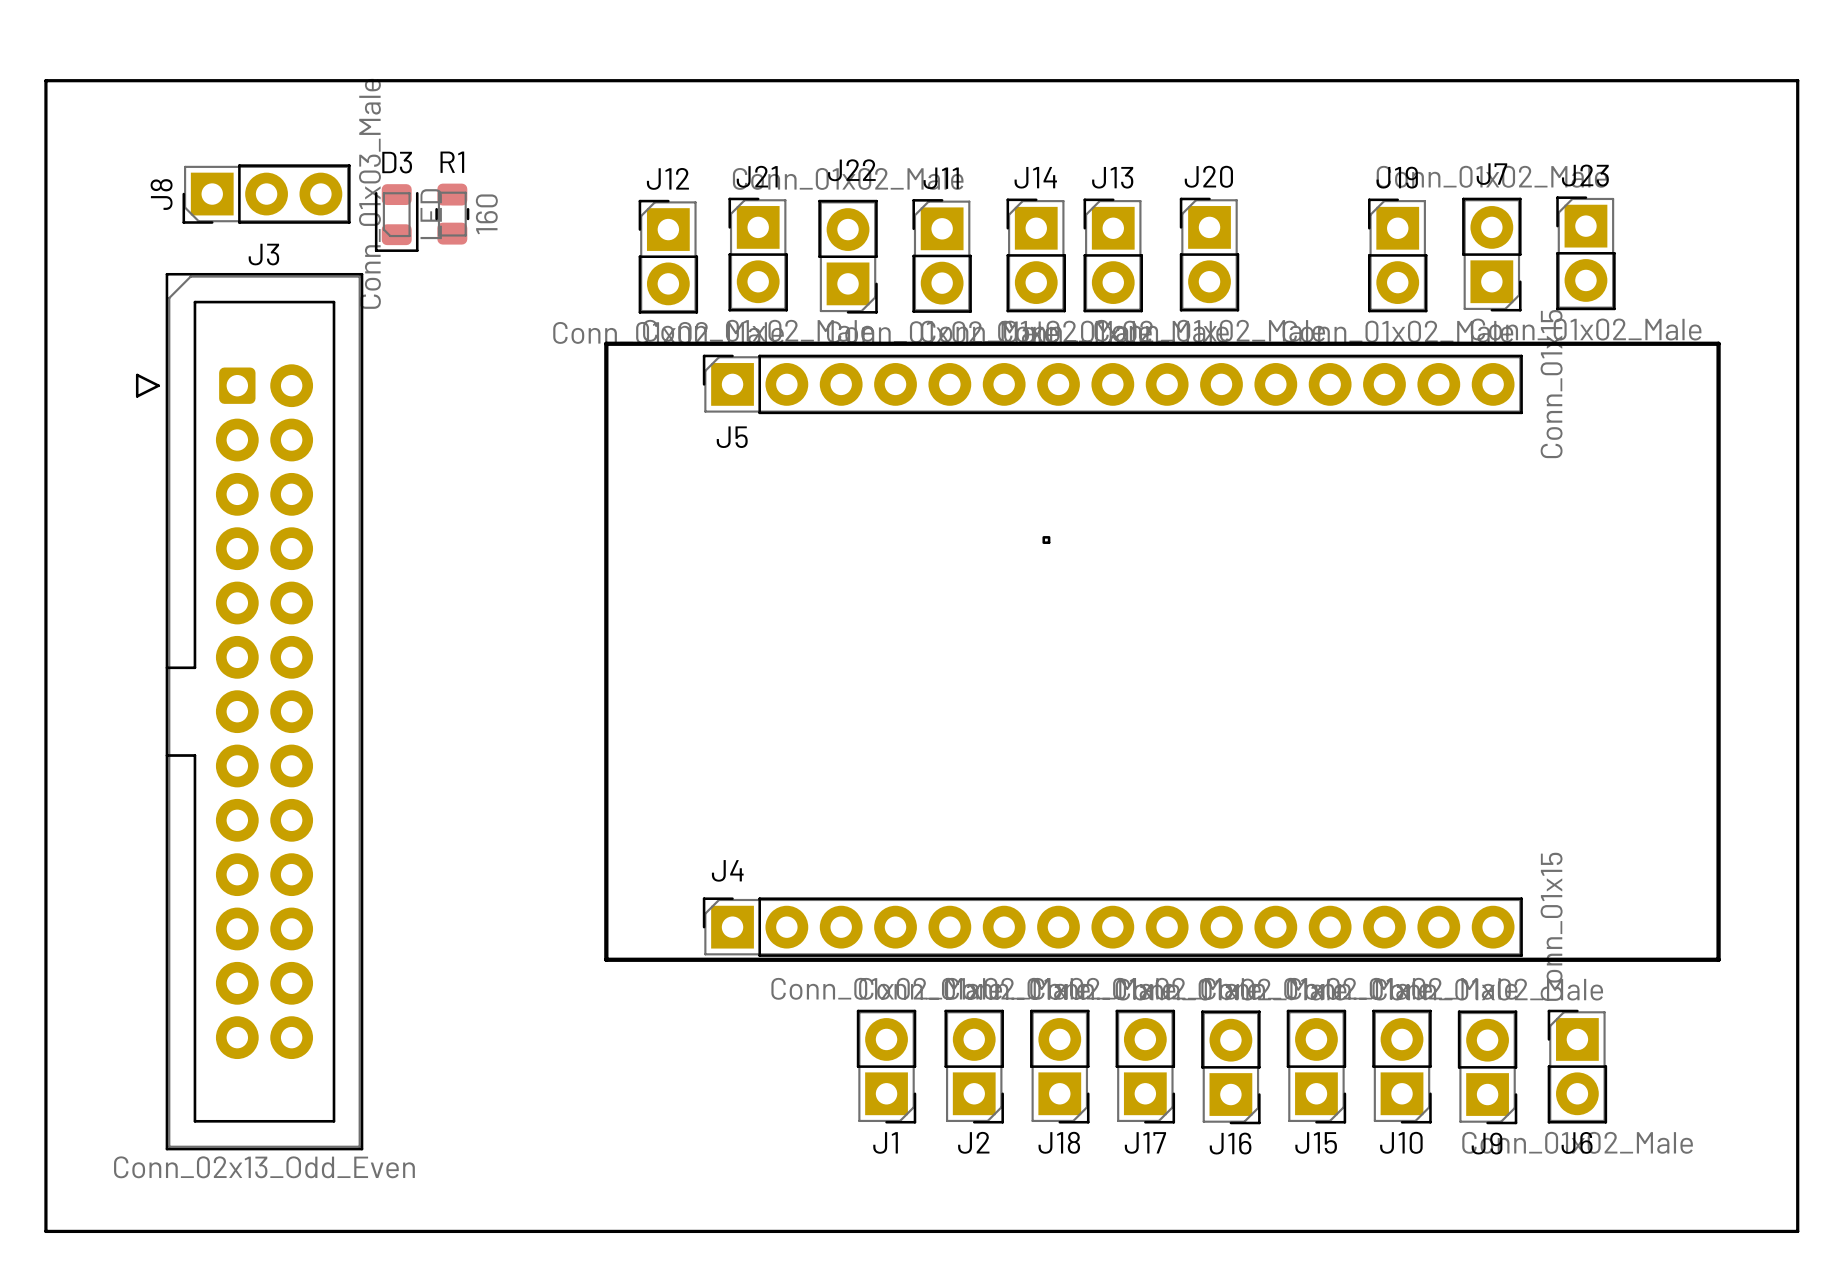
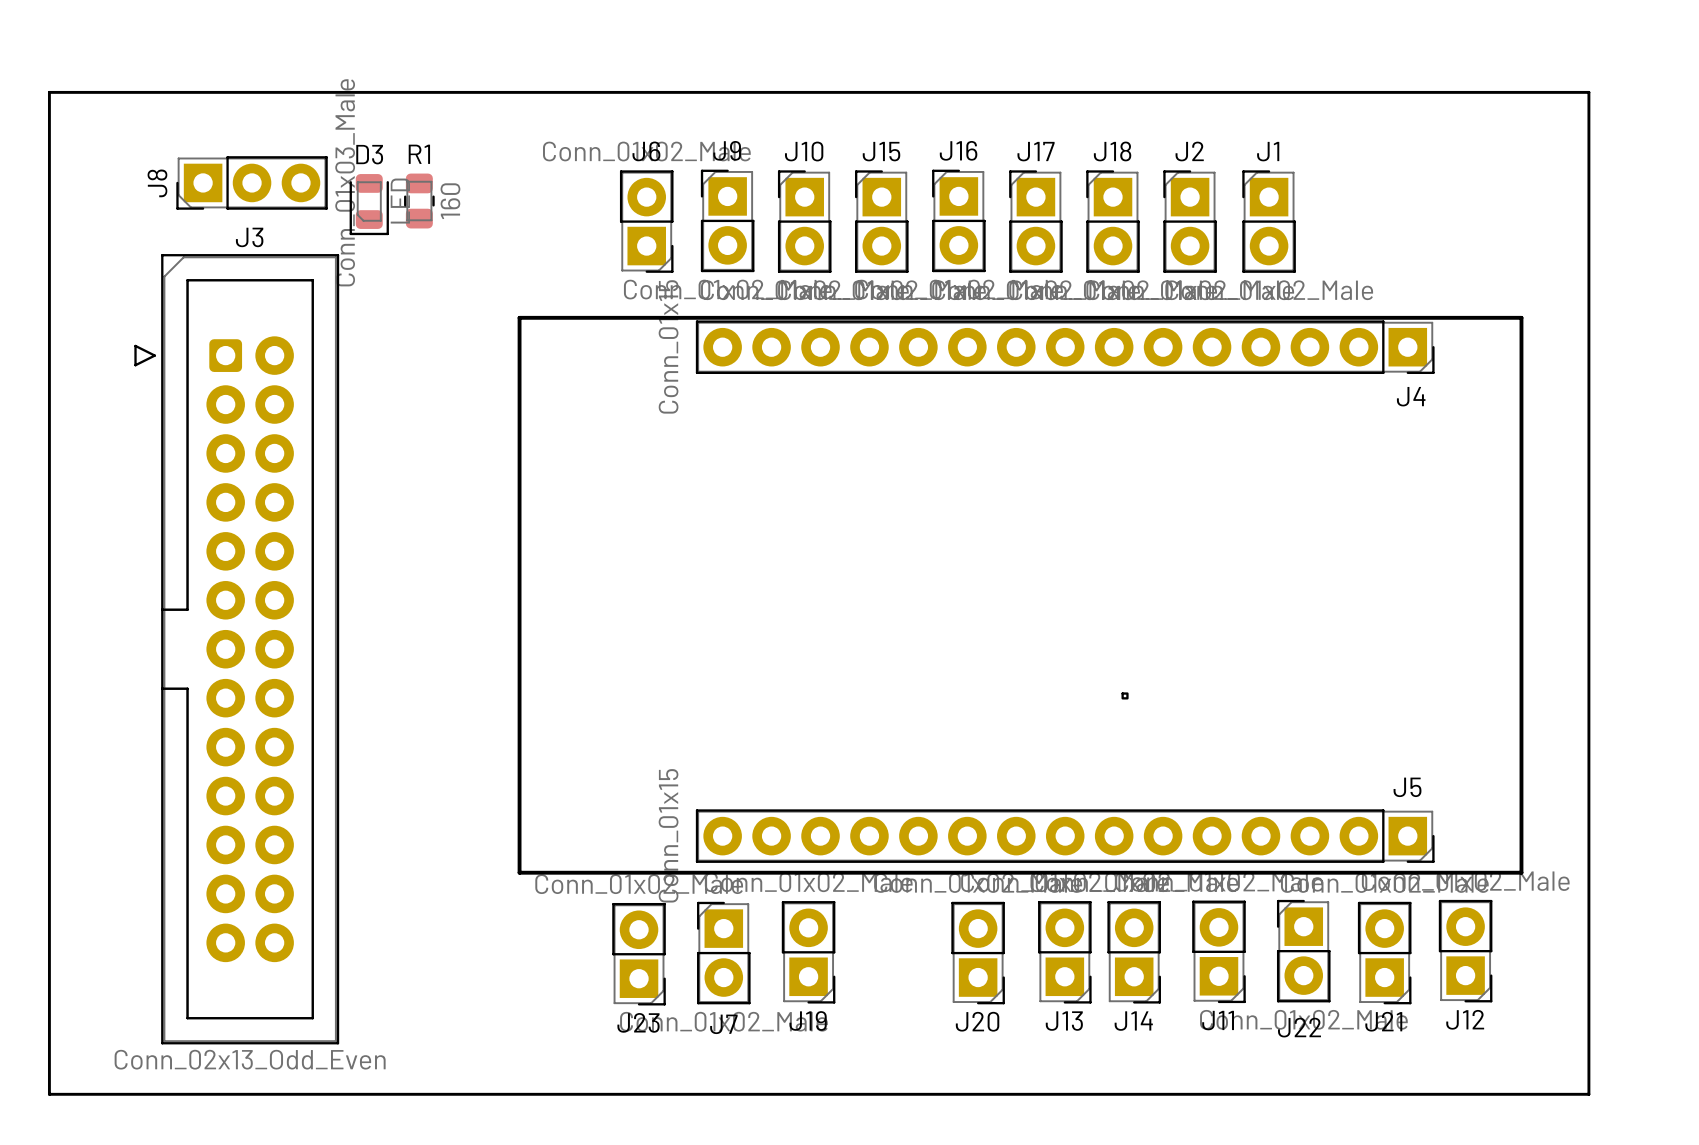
board edge: (45, 80) (45, 1231) (1797, 1231) (1797, 80) (45, 80) -> (49, 92) (49, 1094) (1588, 1094) (1588, 92) (49, 92)
J23 rotation: 0° (1585, 253) -> 180° (639, 954)
J23 position: (1585, 253) -> (639, 954)
J21 rotation: 0° (758, 254) -> 180° (1384, 953)
J21 position: (758, 254) -> (1384, 953)
J20 rotation: 0° (1209, 254) -> 180° (978, 953)
J20 position: (1209, 254) -> (978, 953)
J7 rotation: 0° (1491, 254) -> 180° (723, 953)
J7 position: (1491, 254) -> (723, 953)
J11 rotation: 0° (942, 255) -> 180° (1218, 951)
J11 position: (942, 255) -> (1218, 951)
J14 rotation: 0° (1036, 255) -> 180° (1134, 952)
J14 position: (1036, 255) -> (1134, 952)
J13 rotation: 0° (1113, 255) -> 180° (1064, 952)
J13 position: (1113, 255) -> (1064, 952)
J19 rotation: 0° (1397, 255) -> 180° (808, 952)
J19 position: (1397, 255) -> (808, 952)
J12 rotation: 0° (668, 256) -> 180° (1465, 951)
J12 position: (668, 256) -> (1465, 951)
J22 rotation: 0° (848, 256) -> 180° (1303, 951)
J22 position: (848, 256) -> (1303, 951)
line: (606, 343) (606, 959) -> (558, 317) (519, 317) (519, 872) (558, 872)
line: (1675, 343) (1718, 343) (1718, 959) (1675, 959) -> (1521, 317) (1521, 872)
J5 rotation: 0° (1112, 384) -> 180° (1065, 836)
J5 position: (1112, 384) -> (1065, 836)
drawing position: (1046, 540) -> (1125, 695)
J4 rotation: 0° (1112, 927) -> 180° (1065, 347)
J4 position: (1112, 927) -> (1065, 347)
J1 rotation: 0° (886, 1066) -> 180° (1269, 221)
J1 position: (886, 1066) -> (1269, 221)
J2 rotation: 0° (974, 1066) -> 180° (1190, 221)
J2 position: (974, 1066) -> (1190, 221)
J18 rotation: 0° (1059, 1066) -> 180° (1113, 221)
J18 position: (1059, 1066) -> (1113, 221)
J17 rotation: 0° (1145, 1066) -> 180° (1035, 221)
J17 position: (1145, 1066) -> (1035, 221)
J15 rotation: 0° (1316, 1066) -> 180° (881, 221)
J15 position: (1316, 1066) -> (881, 221)
J10 rotation: 0° (1402, 1066) -> 180° (804, 221)
J10 position: (1402, 1066) -> (804, 221)
J6 rotation: 0° (1577, 1066) -> 180° (646, 221)
J6 position: (1577, 1066) -> (646, 221)
J16 rotation: 0° (1230, 1067) -> 180° (958, 220)
J16 position: (1230, 1067) -> (958, 220)
J9 rotation: 0° (1487, 1067) -> 180° (727, 220)
J9 position: (1487, 1067) -> (727, 220)

